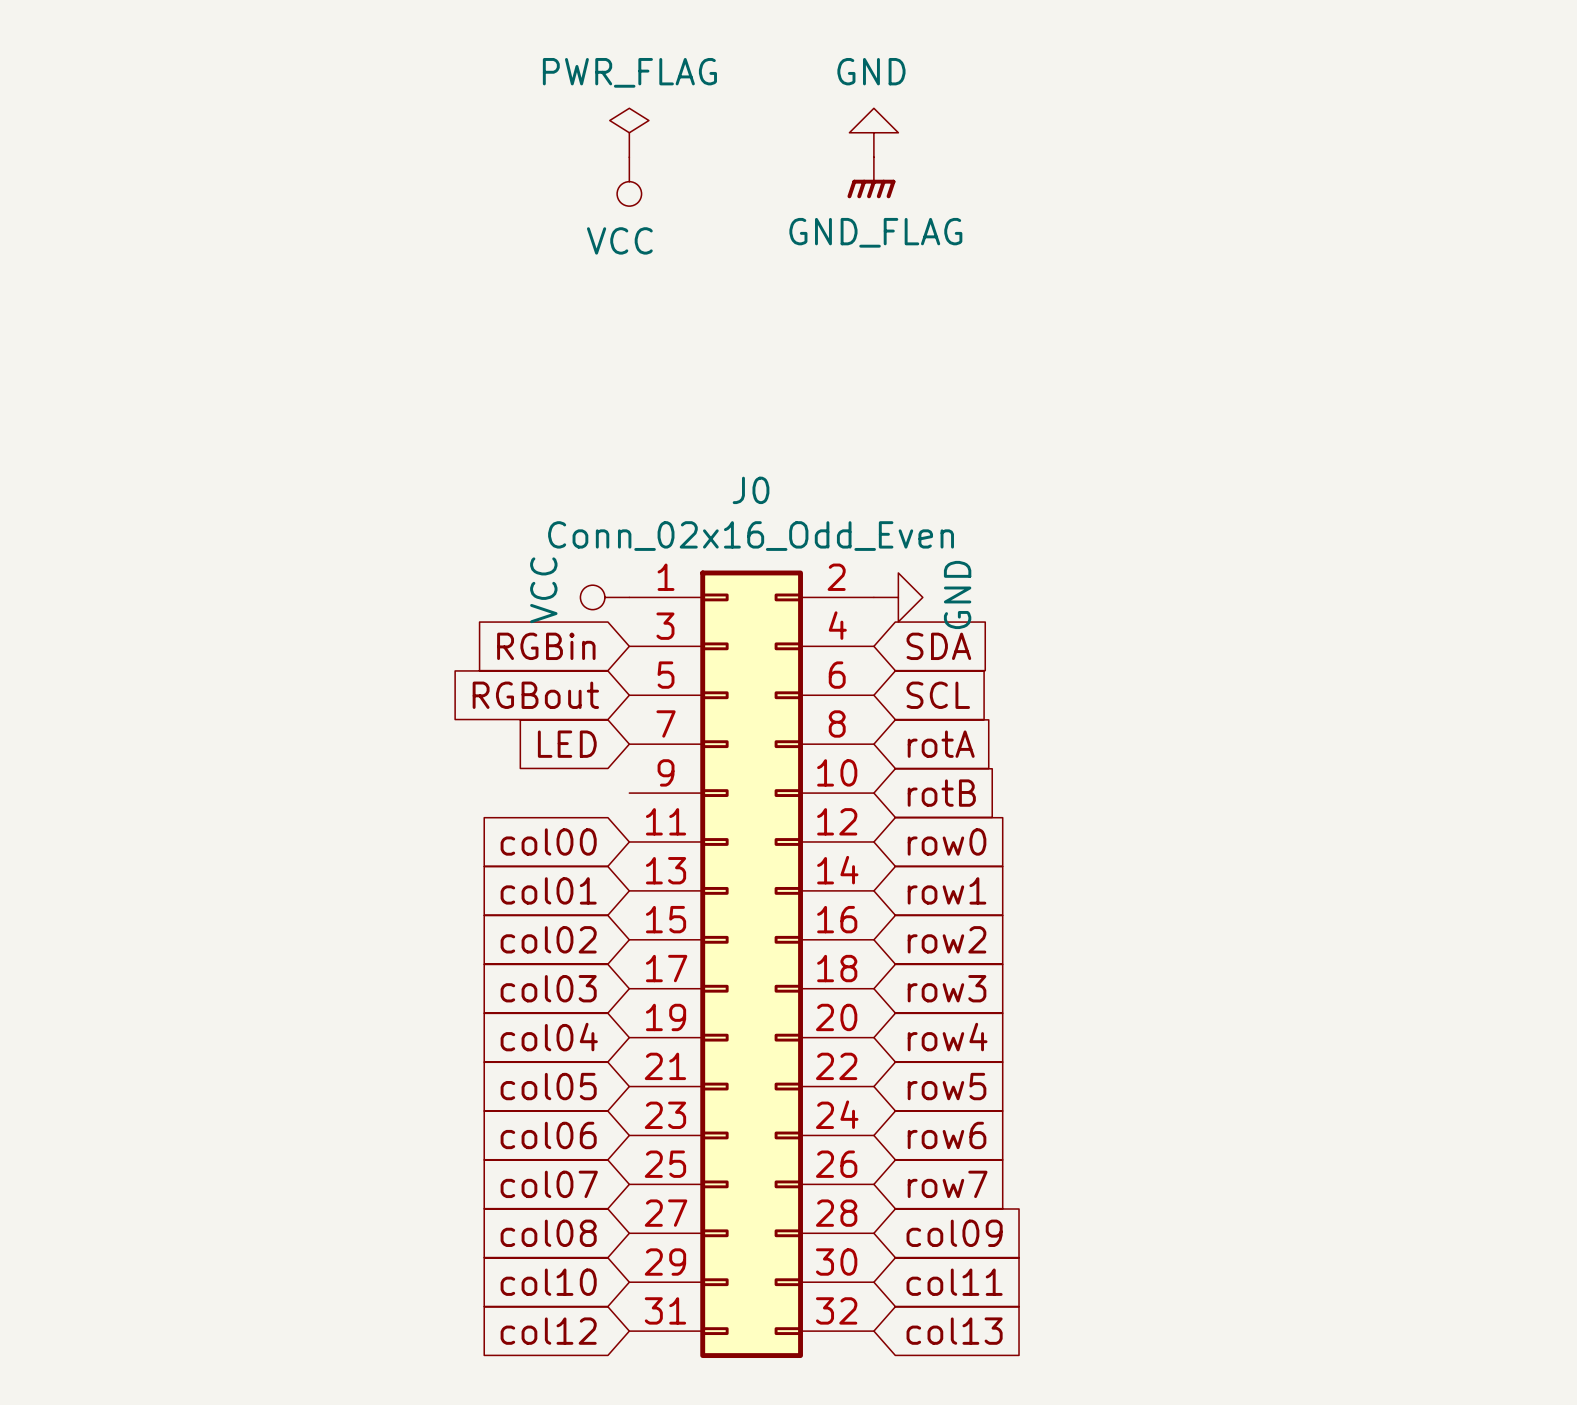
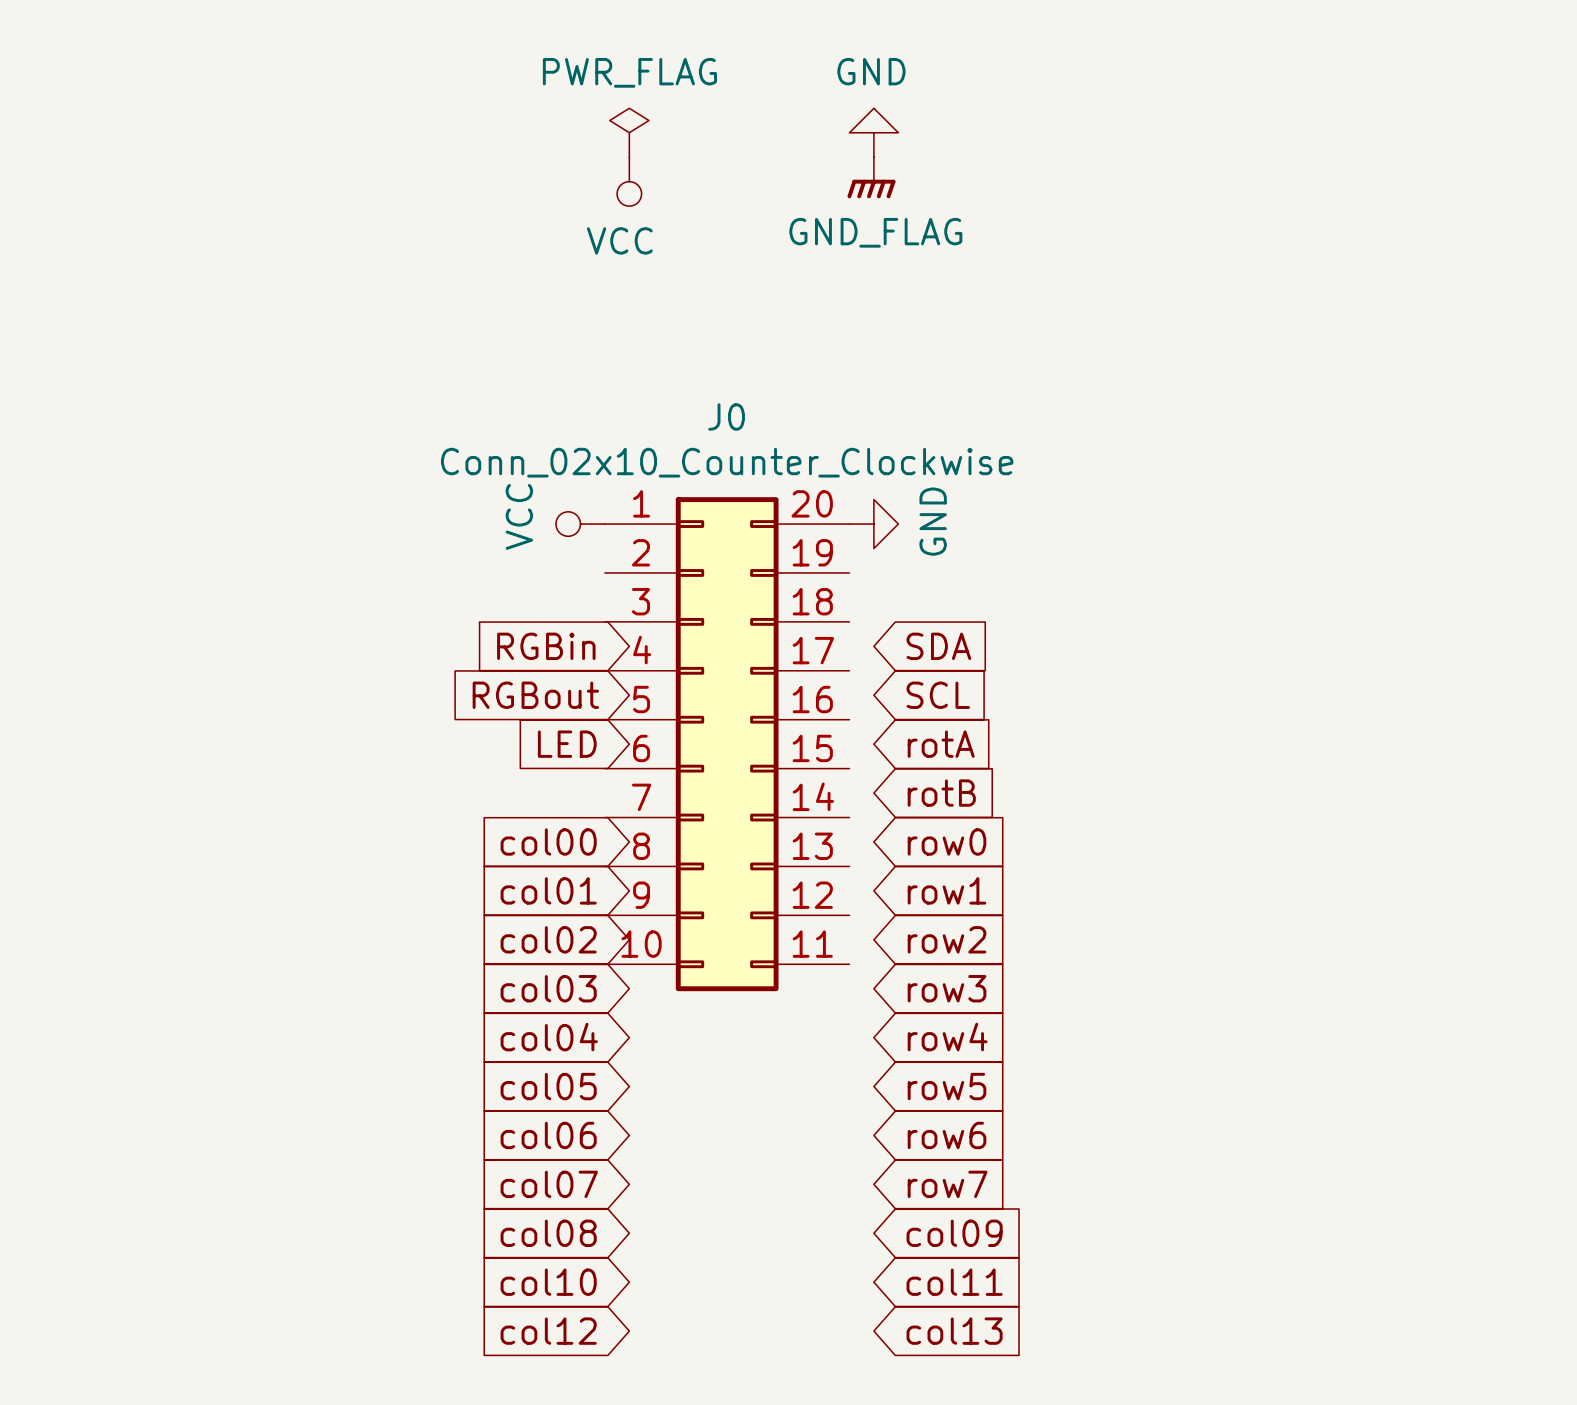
J0 name position: J0 (751, 490) -> J0 (726, 417)
J0 value: Conn_02x16_Odd_Even (751, 536) -> Conn_02x10_Counter_Clockwise (727, 462)
J0 symbol: [629, 570, 874, 1359] -> [604, 497, 850, 992]
power symbol position: VCC (604, 597) -> VCC (580, 524)
power symbol position: GND (898, 597) -> GND (873, 524)

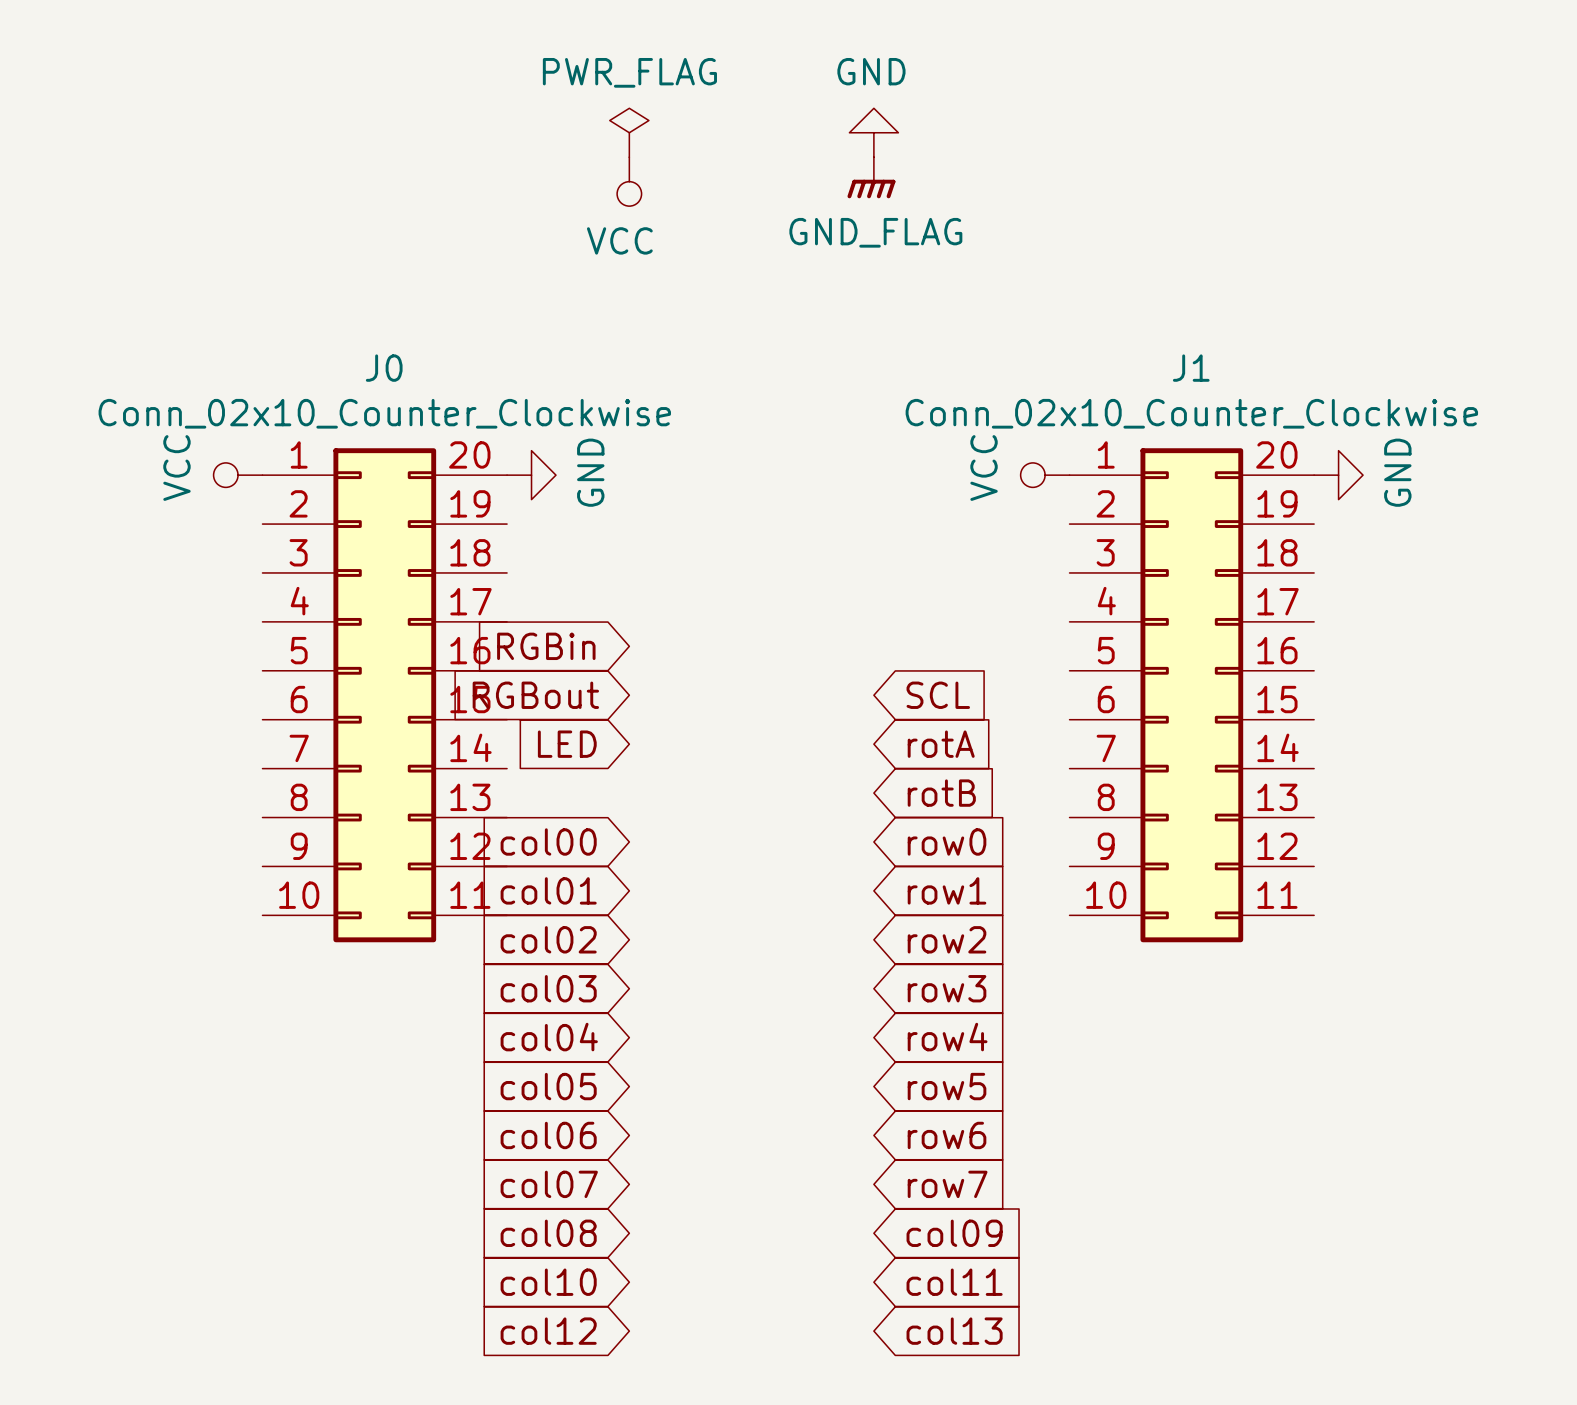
power symbol: none -> VCC (238, 475)
power symbol: none -> GND (531, 475)
power symbol: none -> VCC (1045, 475)
power symbol: none -> GND (1338, 475)
power symbol: VCC (580, 524) -> none
power symbol: GND (873, 524) -> none
global label: SDA (938, 646) -> none
J1: none -> Conn_02x10_Counter_Clockwise (1191, 695)
J0 position: (727, 744) -> (384, 695)

